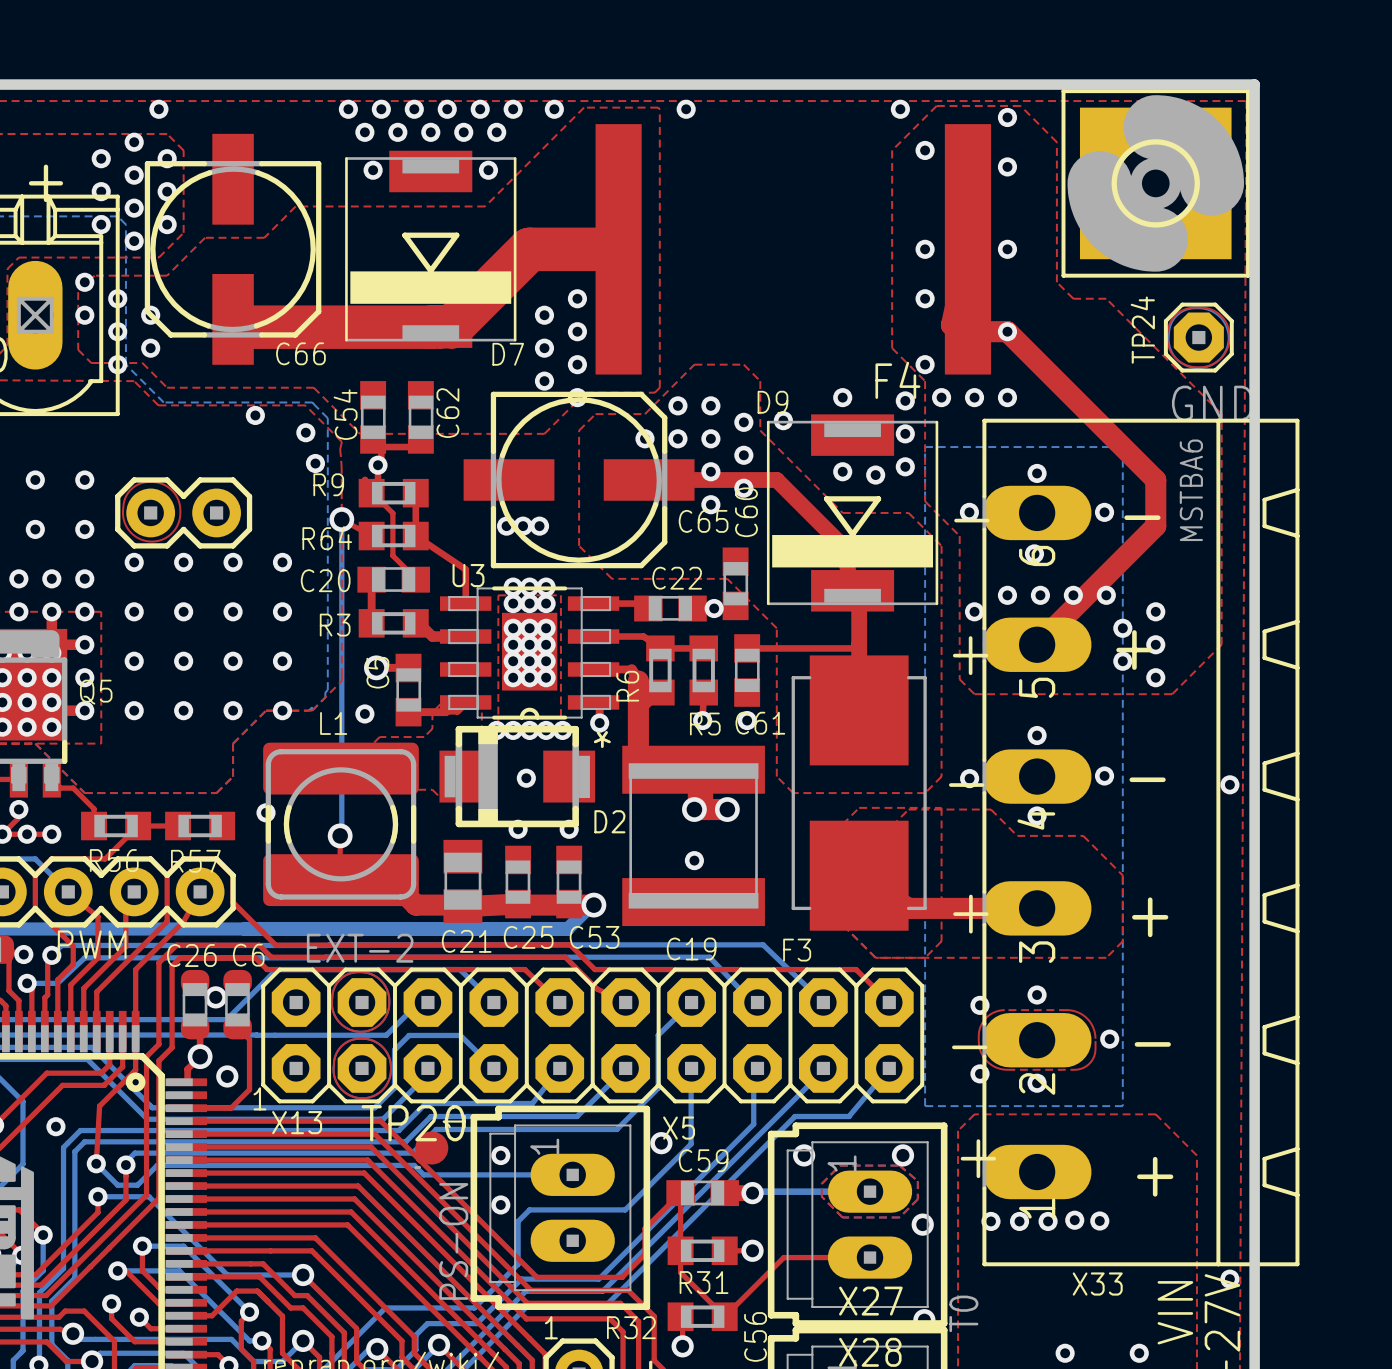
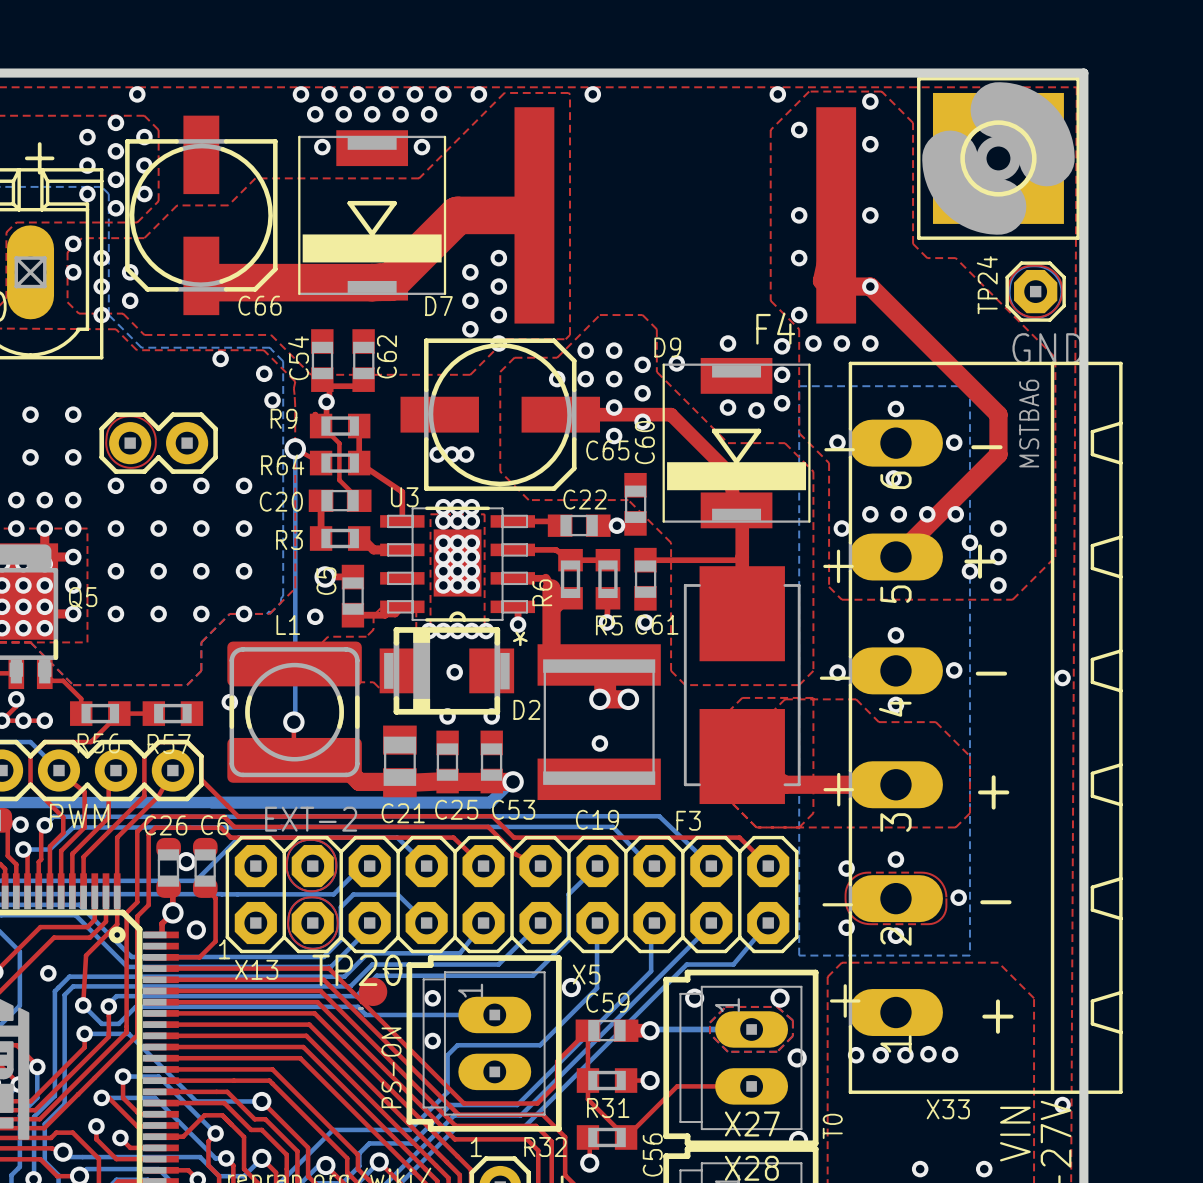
text: none -> PS-ON (391, 1067)
X5 value: PS-ON (453, 1241) -> none
text: none -> T0 (832, 1126)
X27 value: T0 (963, 1313) -> none

